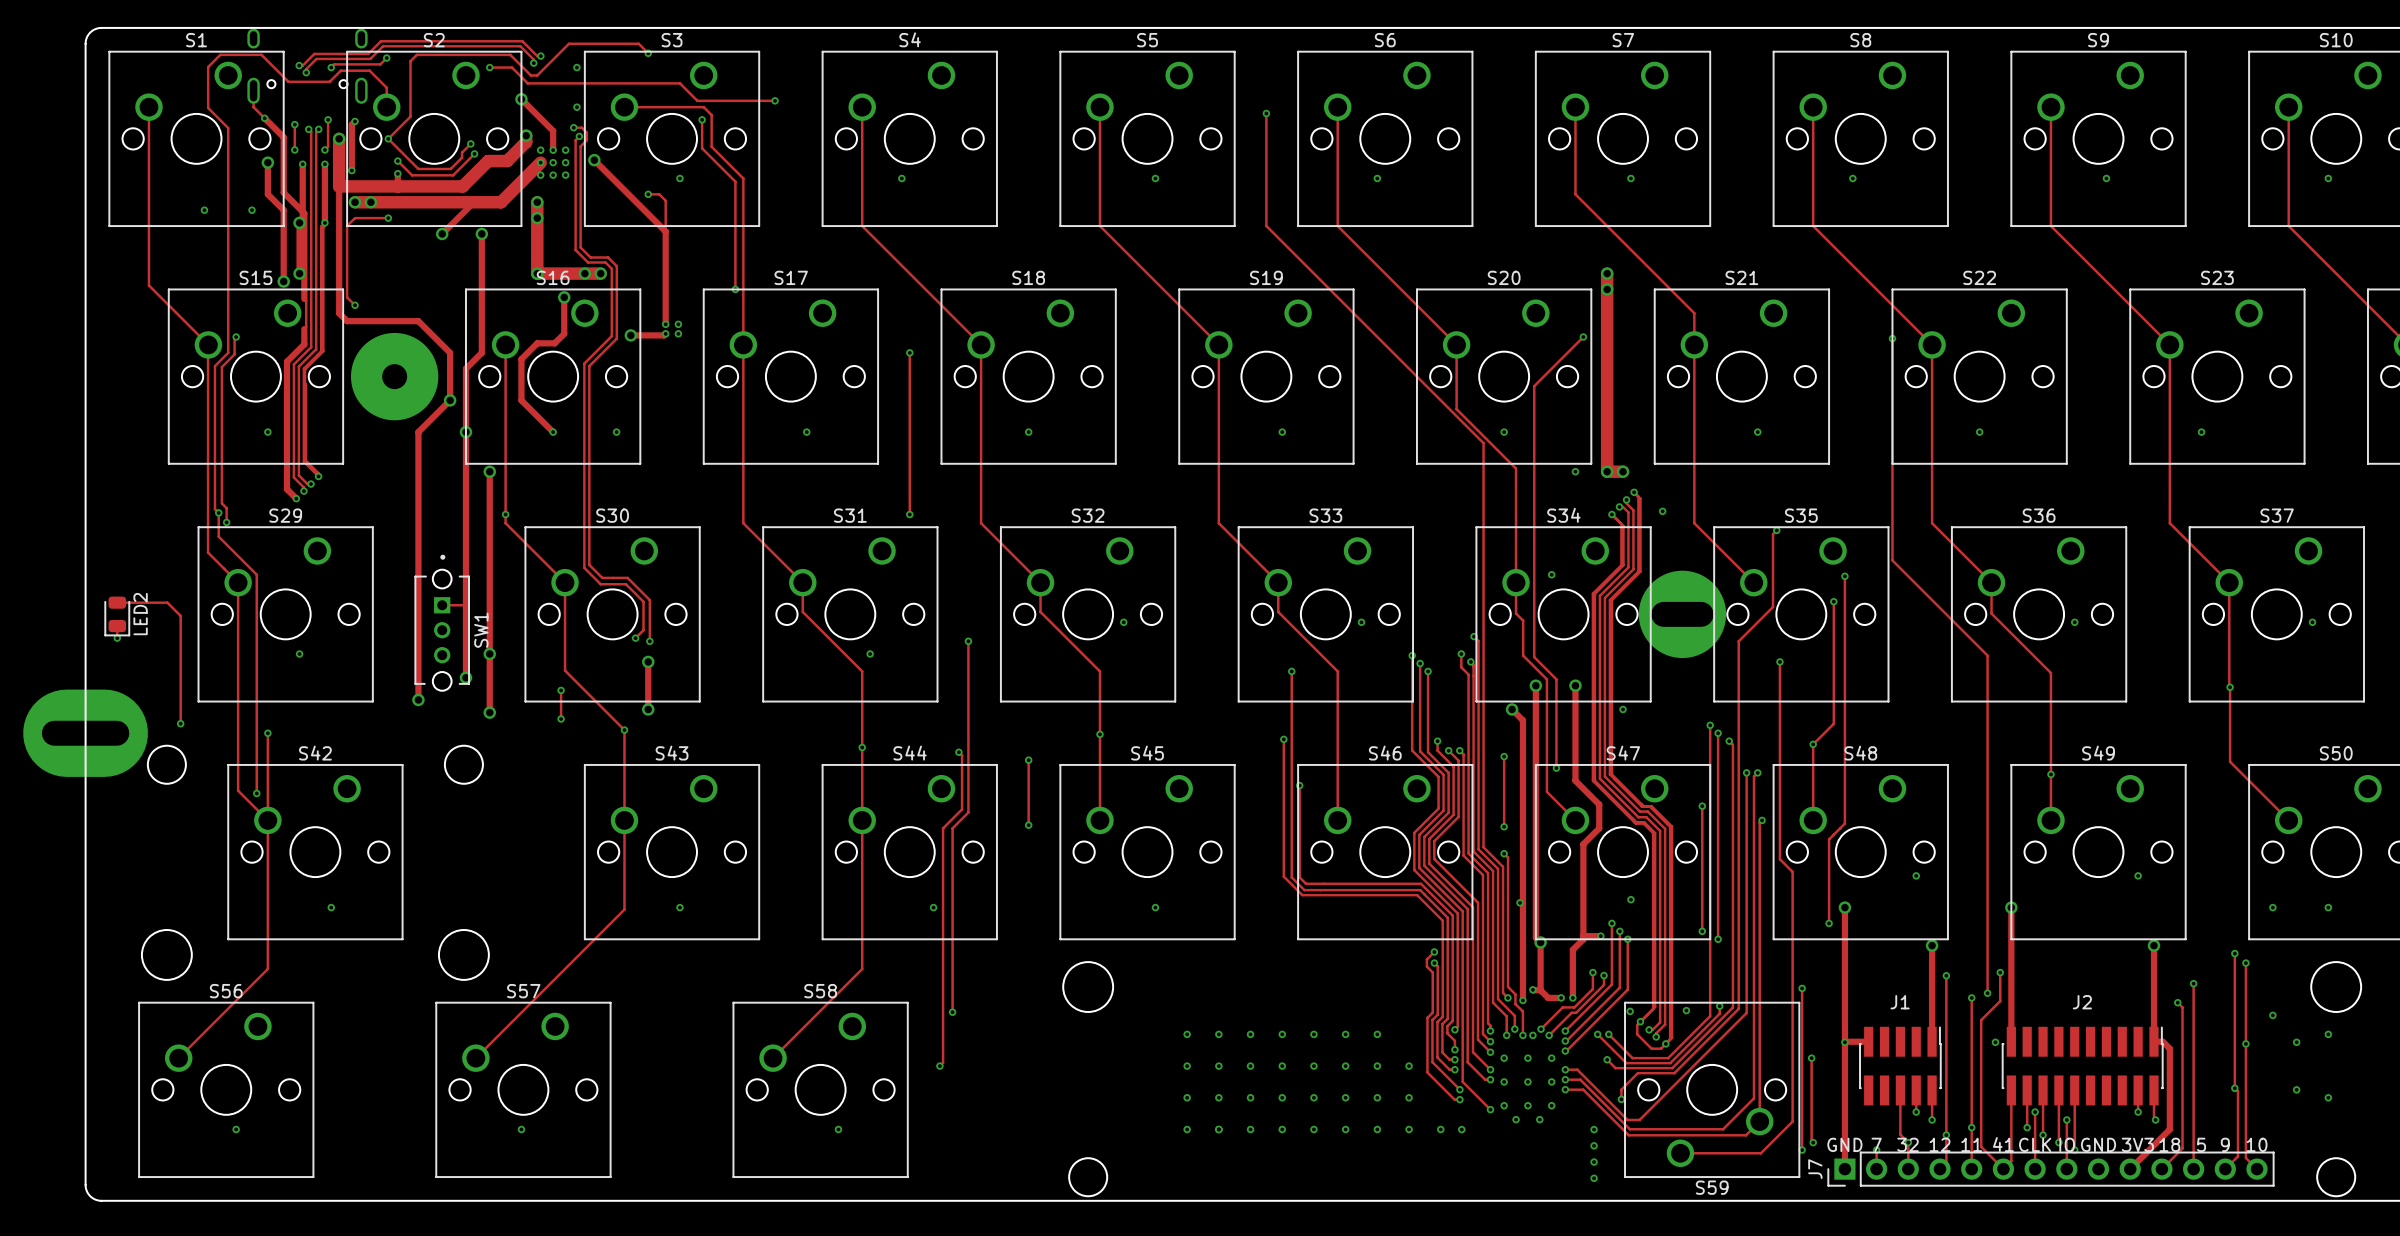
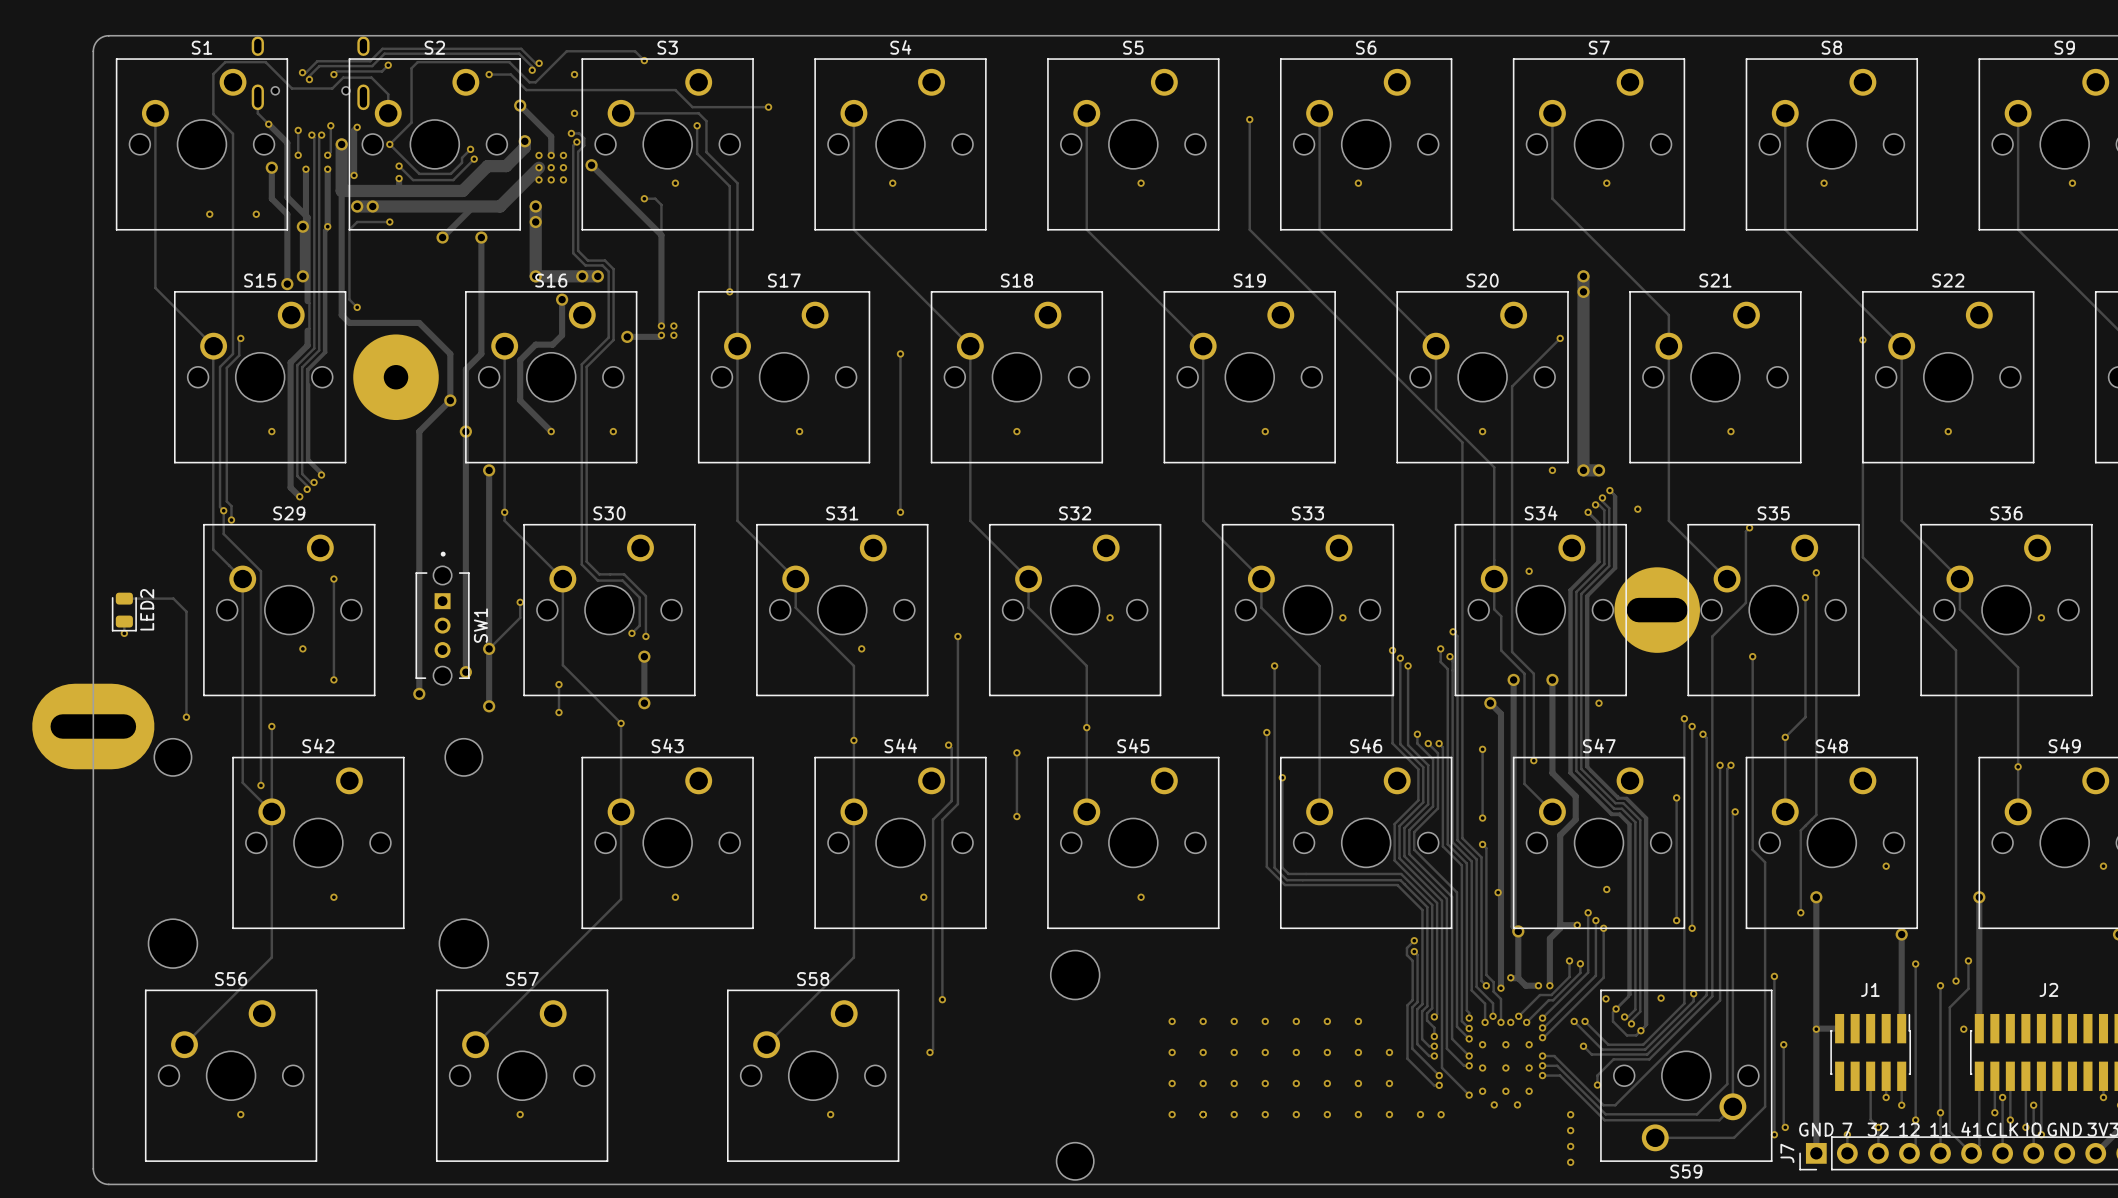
track: none -> (333, 579) (333, 679)
via: none -> (333, 579)
track: (442, 605) (464, 605) -> none
track: none -> (520, 602) (520, 617) (489, 648)
via: none -> (520, 602)
via: none -> (333, 679)

